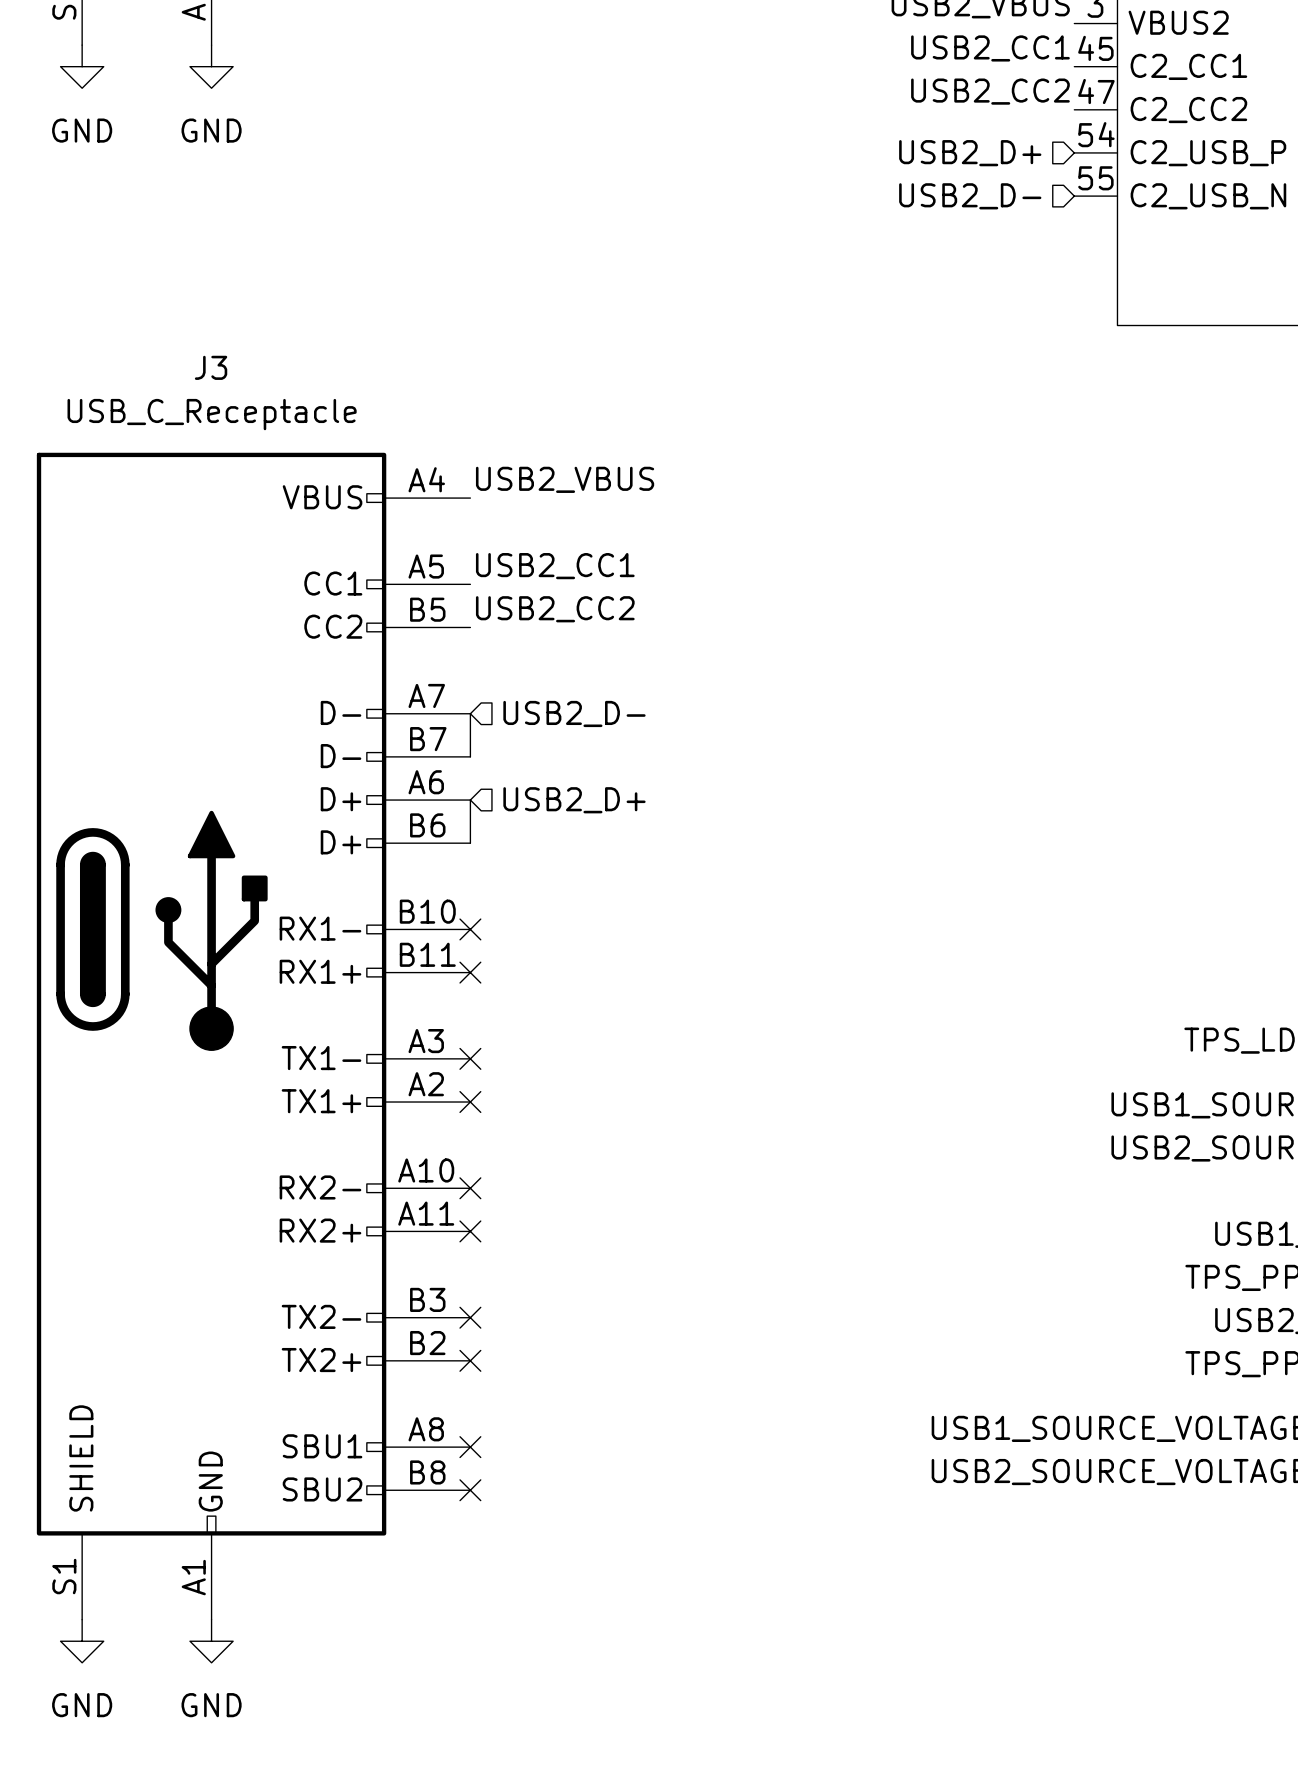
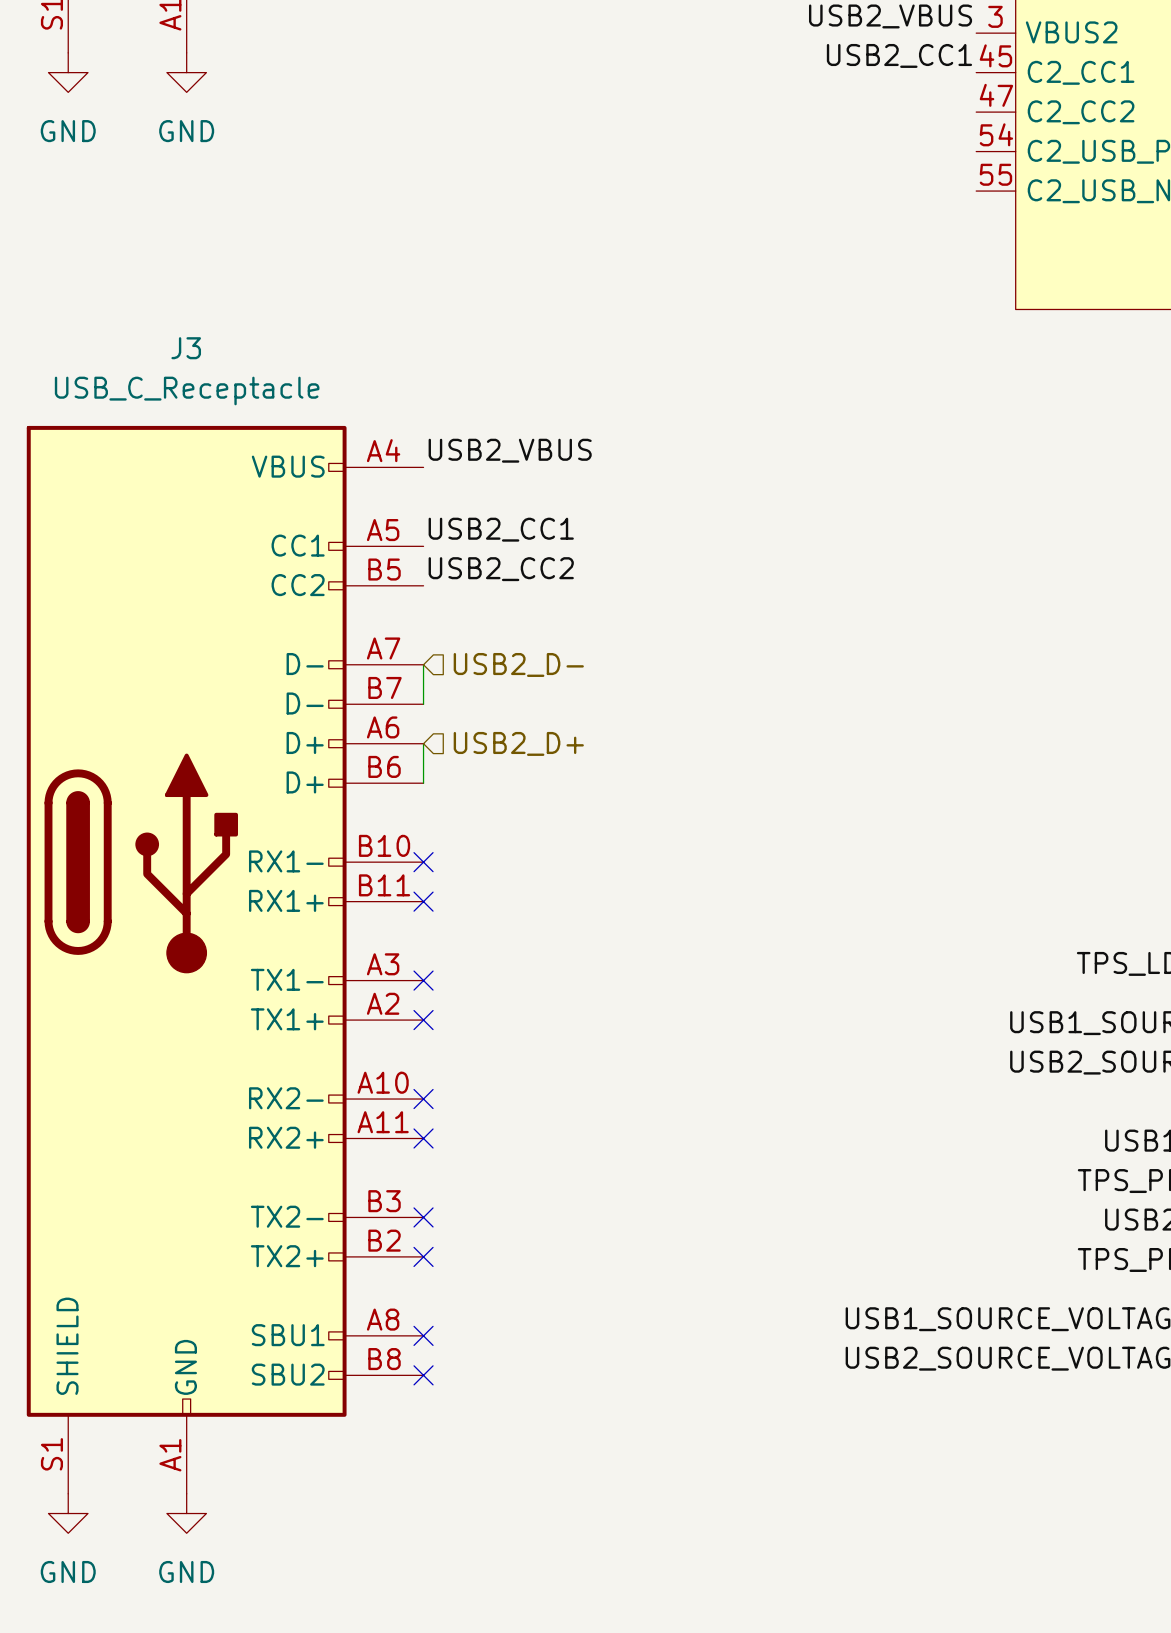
label: USB2_CC2 (990, 91) -> none
hierarchical label: USB2_D+ (970, 153) -> none
hierarchical label: USB2_D- (970, 196) -> none

